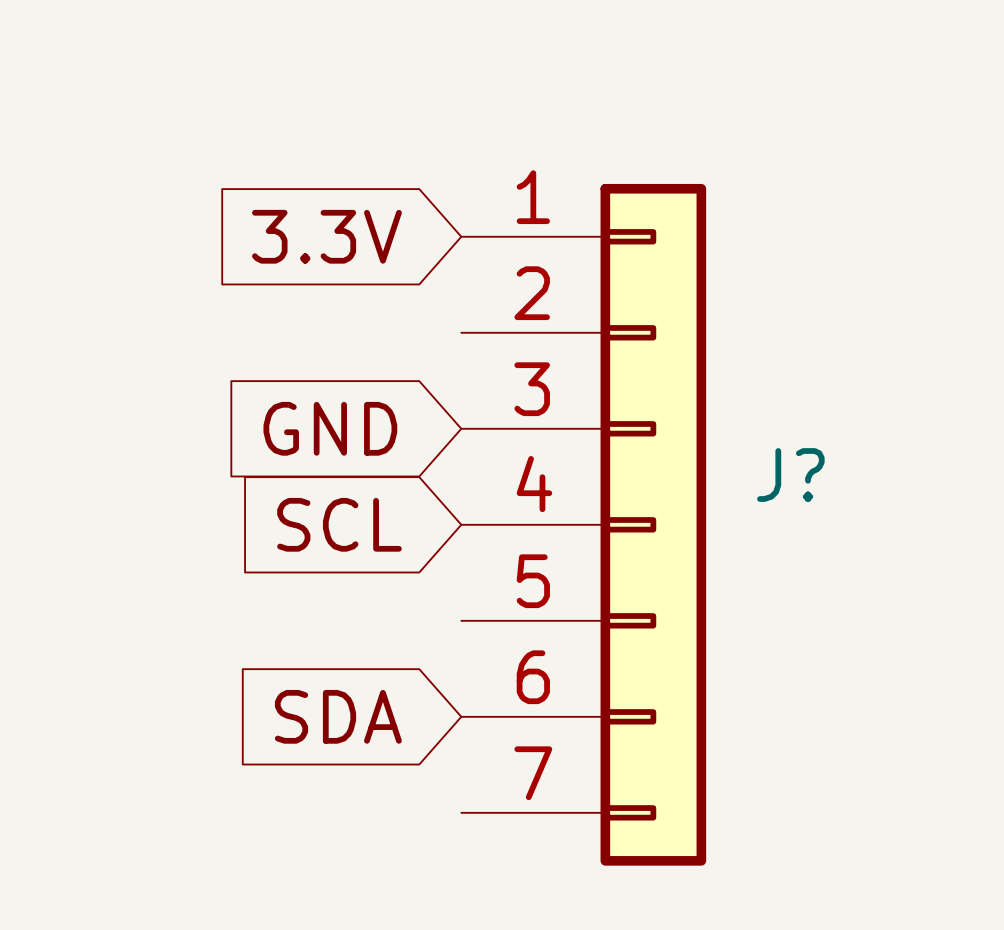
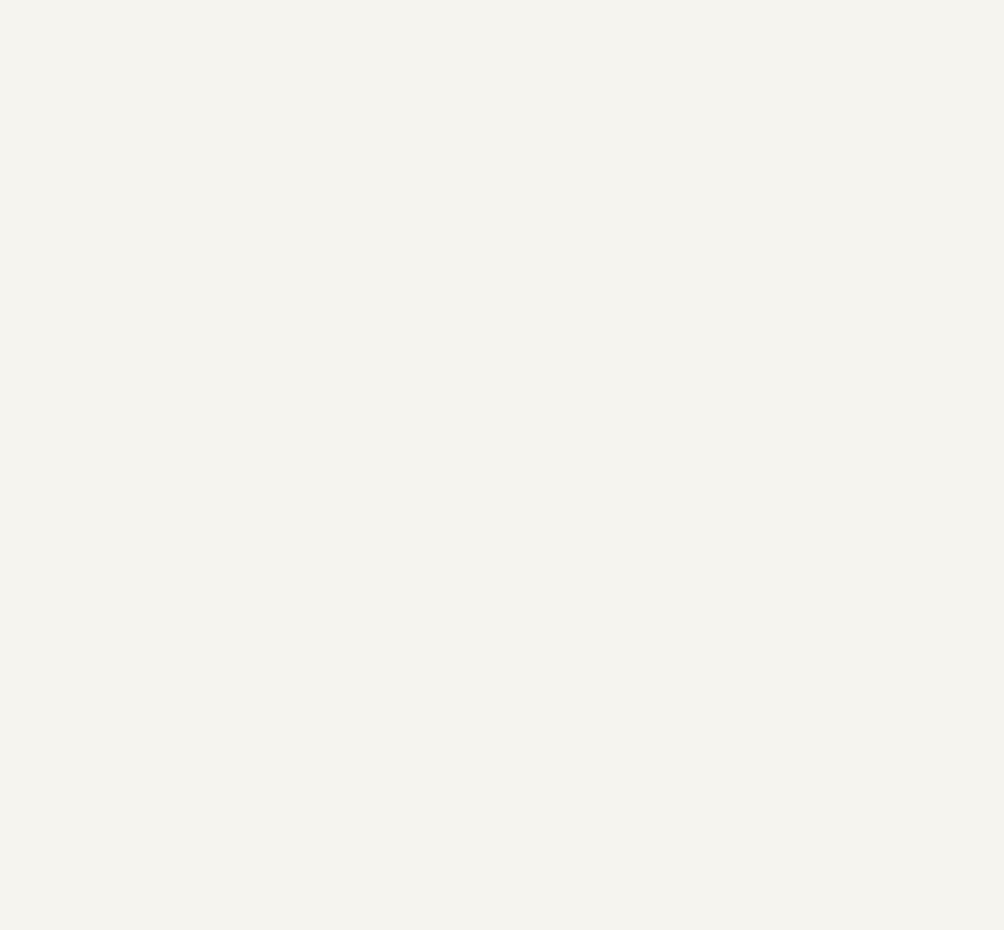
global label: 3.3V (326, 236) -> none
global label: GND (330, 428) -> none
global label: SCL (339, 524) -> none
J?: (583, 524) -> none
global label: SDA (338, 716) -> none

